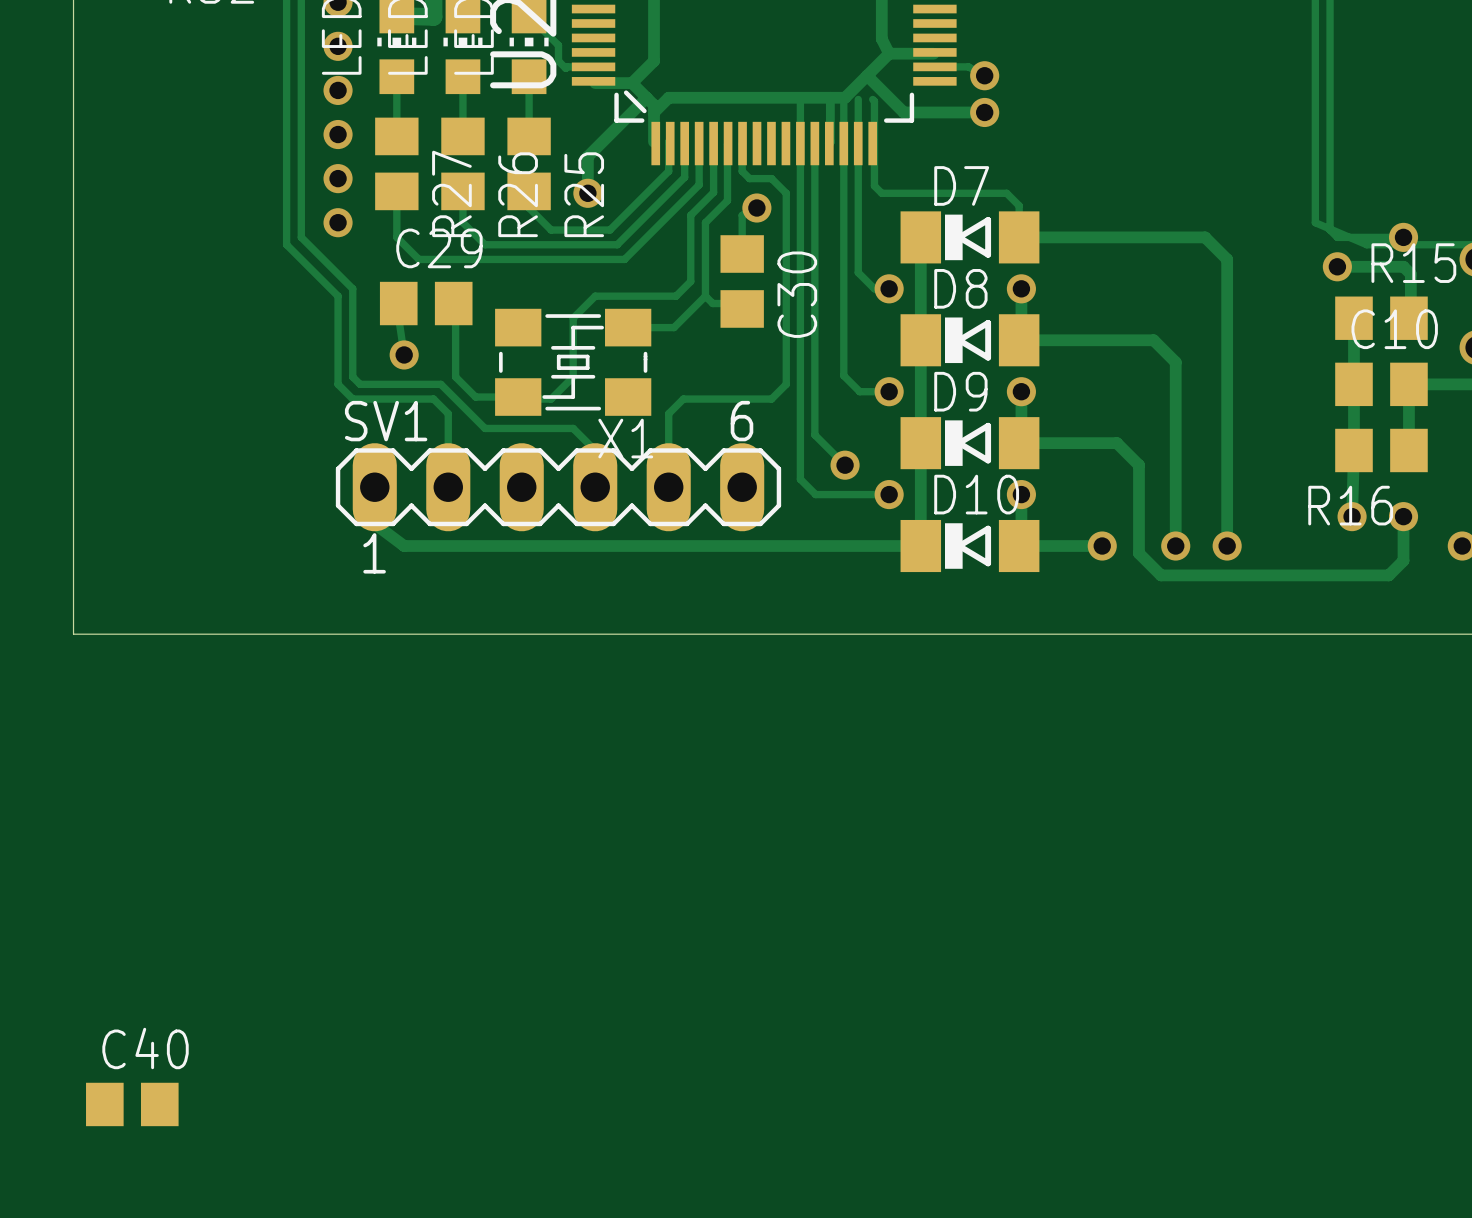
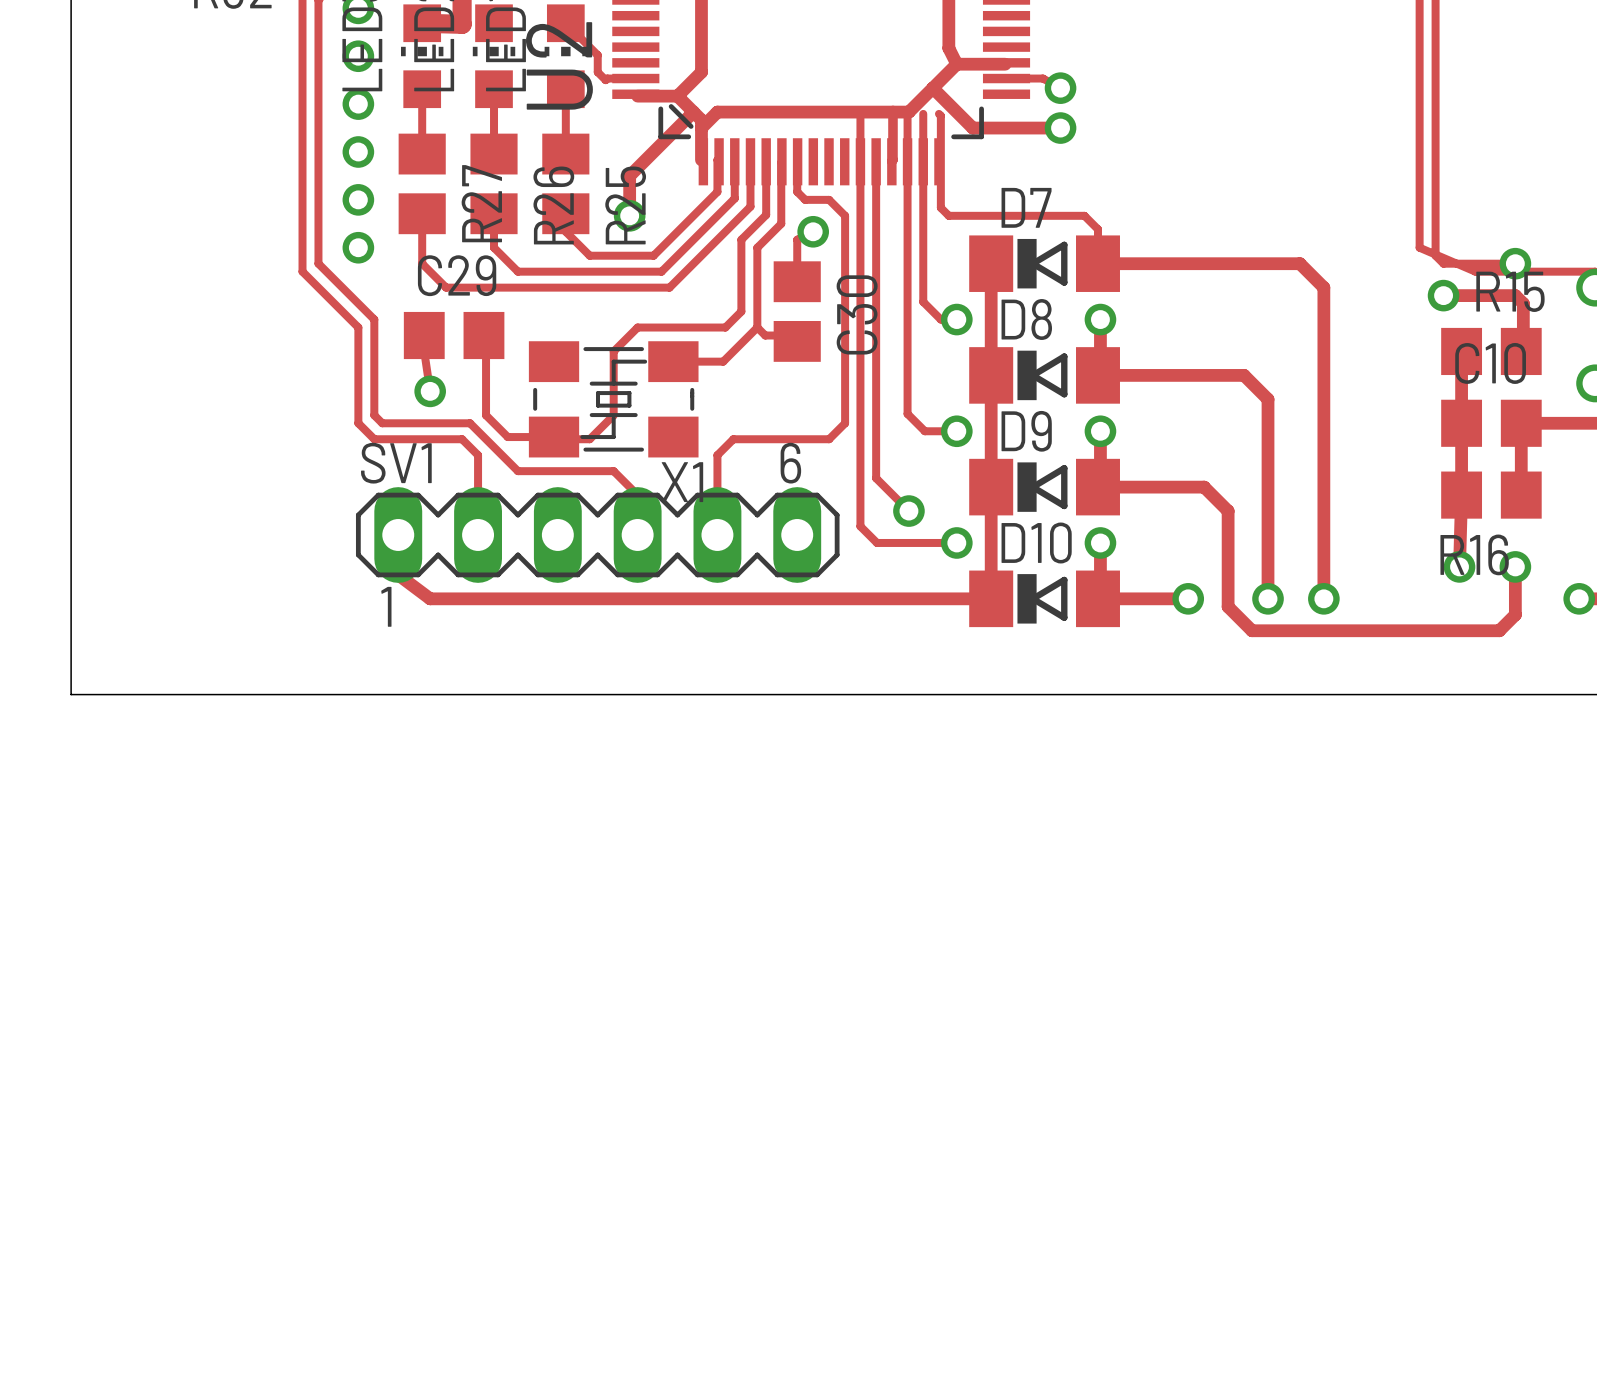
C40: (132, 1104) -> none

